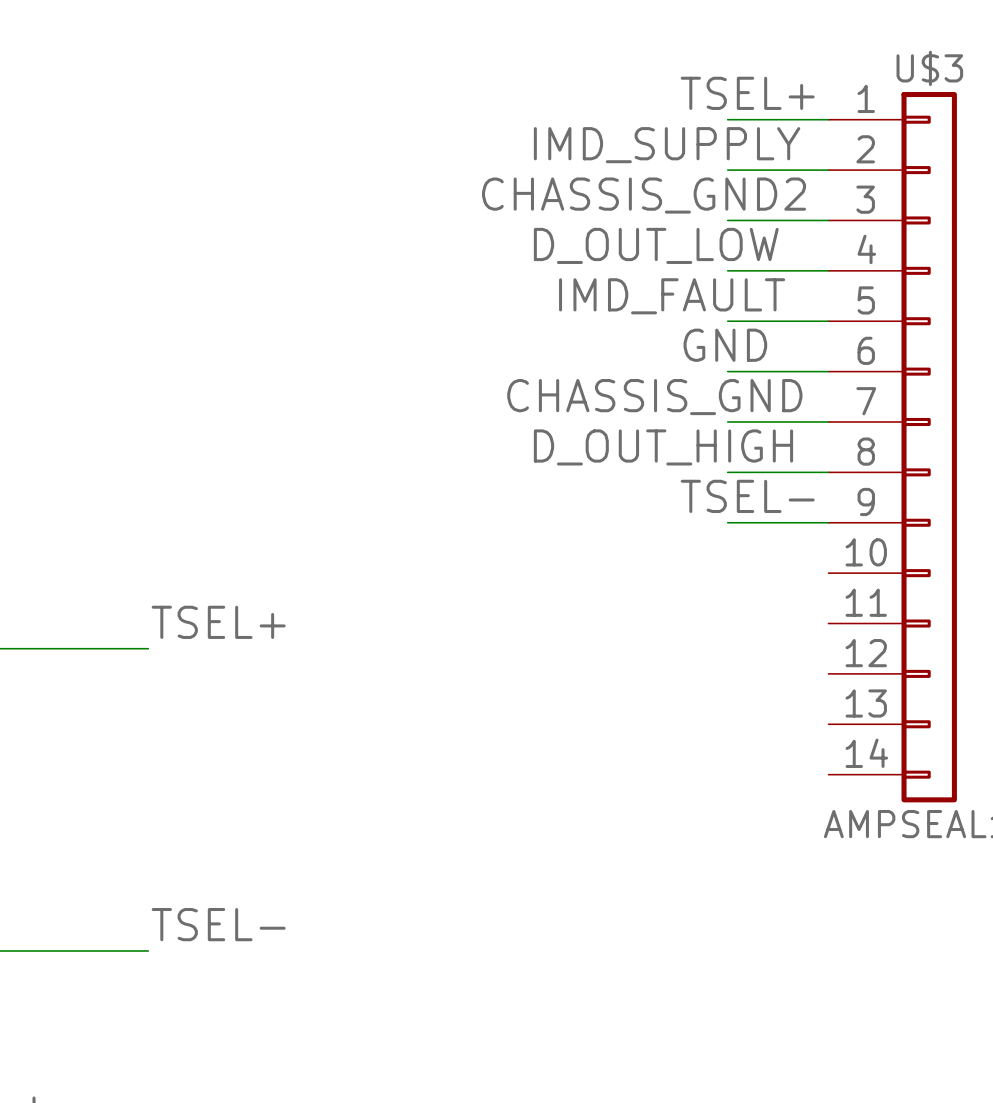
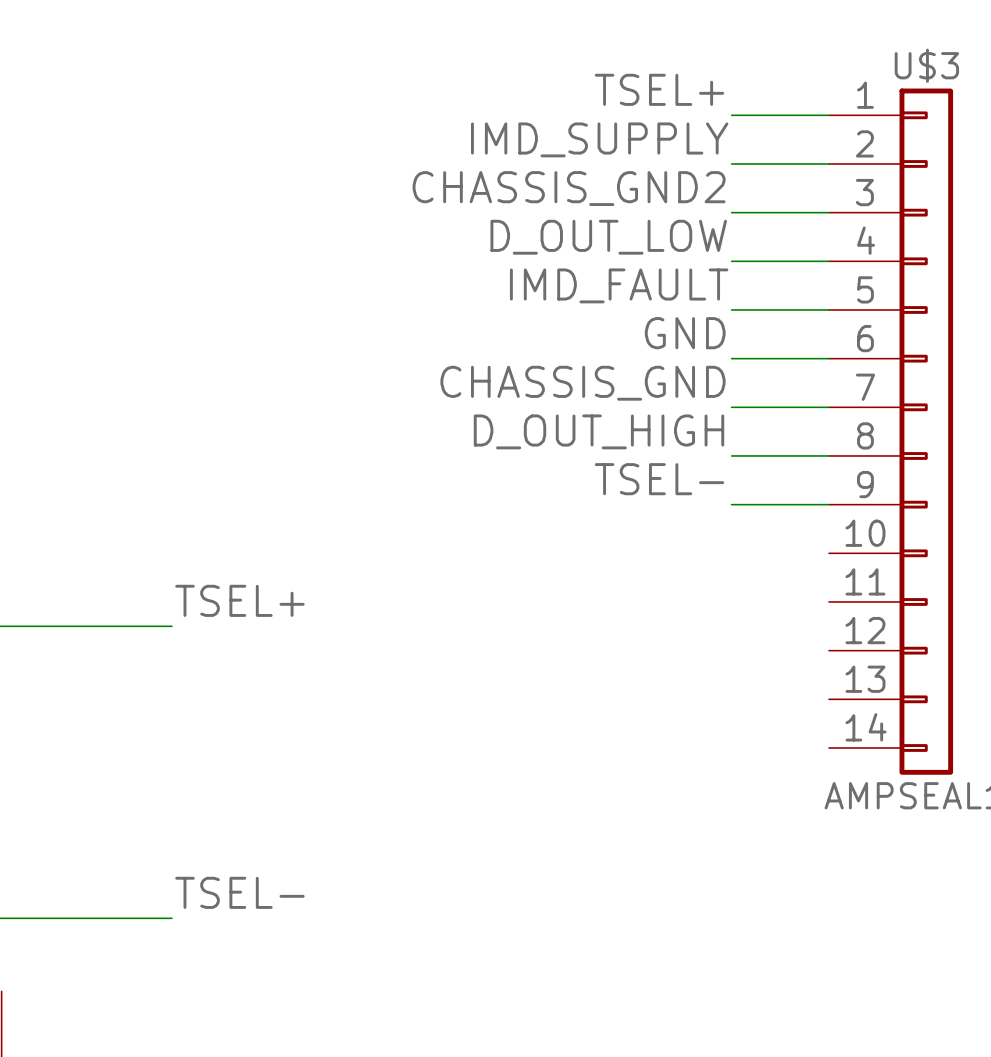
label position: TSEL+ (747, 93) -> TSEL+ (659, 89)
label position: IMD_SUPPLY (667, 145) -> IMD_SUPPLY (599, 139)
label position: CHASSIS_GND2 (644, 195) -> CHASSIS_GND2 (569, 188)
label position: D_OUT_LOW (656, 245) -> D_OUT_LOW (608, 237)
label position: IMD_FAULT (672, 296) -> IMD_FAULT (619, 285)
label position: GND (725, 345) -> GND (685, 333)
label position: CHASSIS_GND (654, 397) -> CHASSIS_GND (583, 383)
label position: D_OUT_HIGH (663, 447) -> D_OUT_HIGH (598, 431)
label position: TSEL- (747, 496) -> TSEL- (659, 479)

